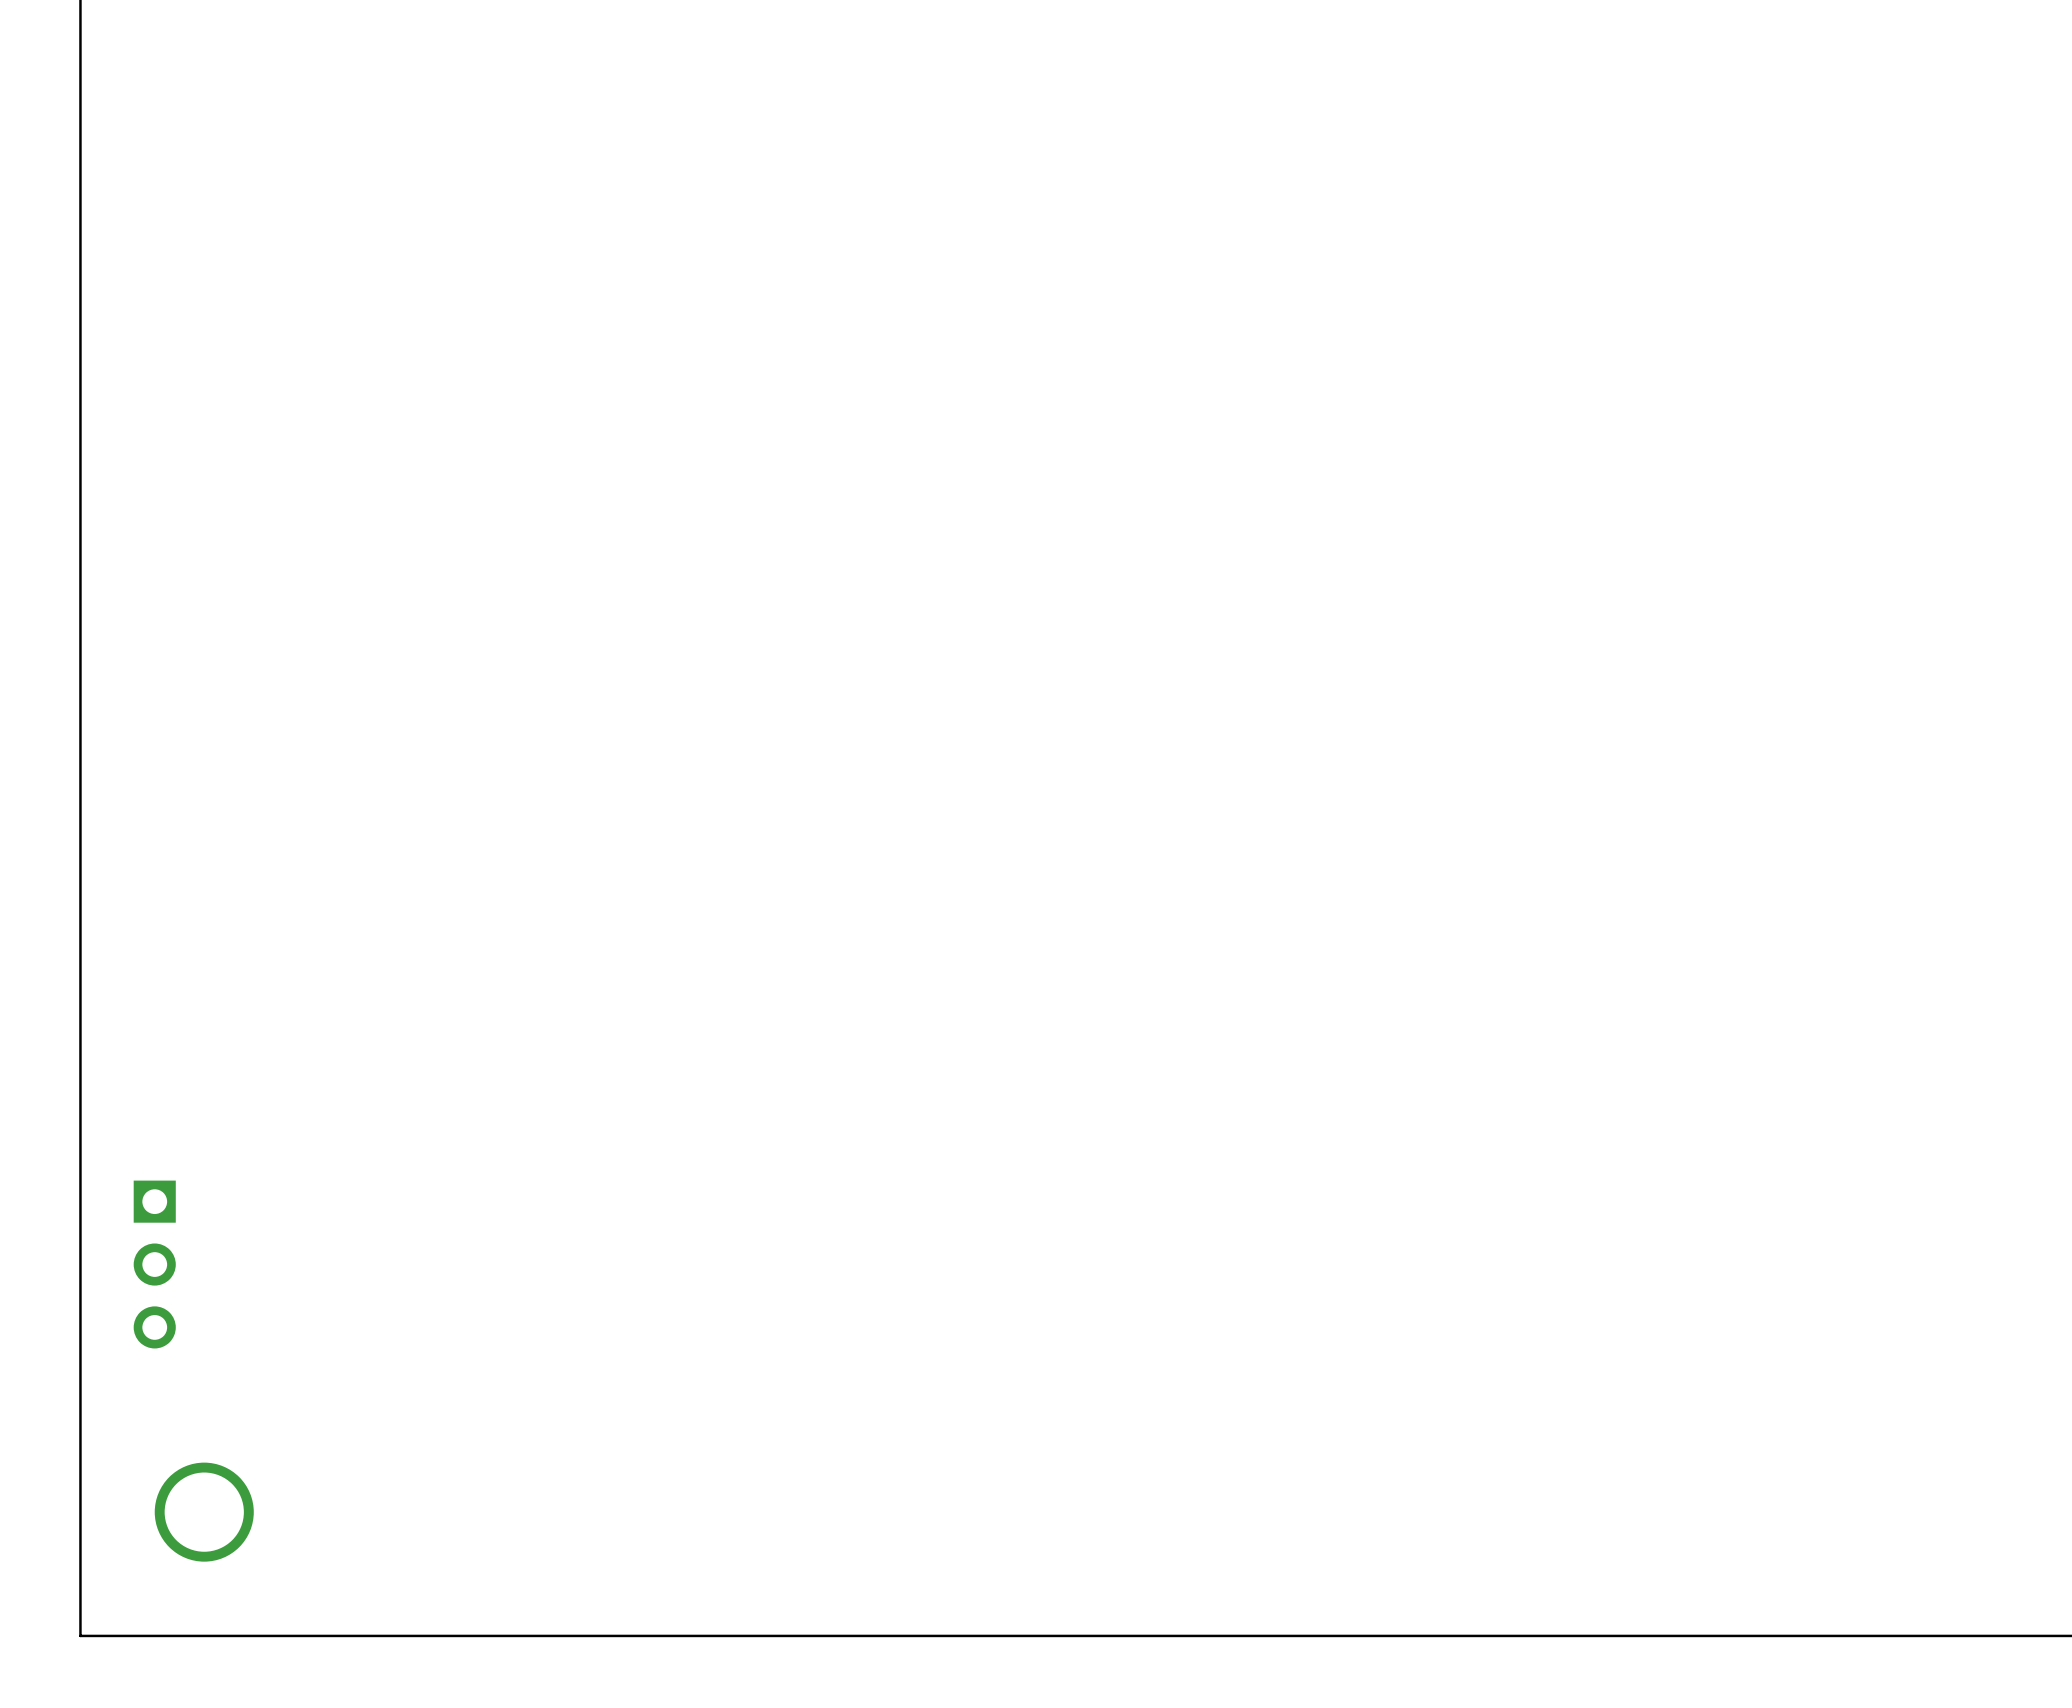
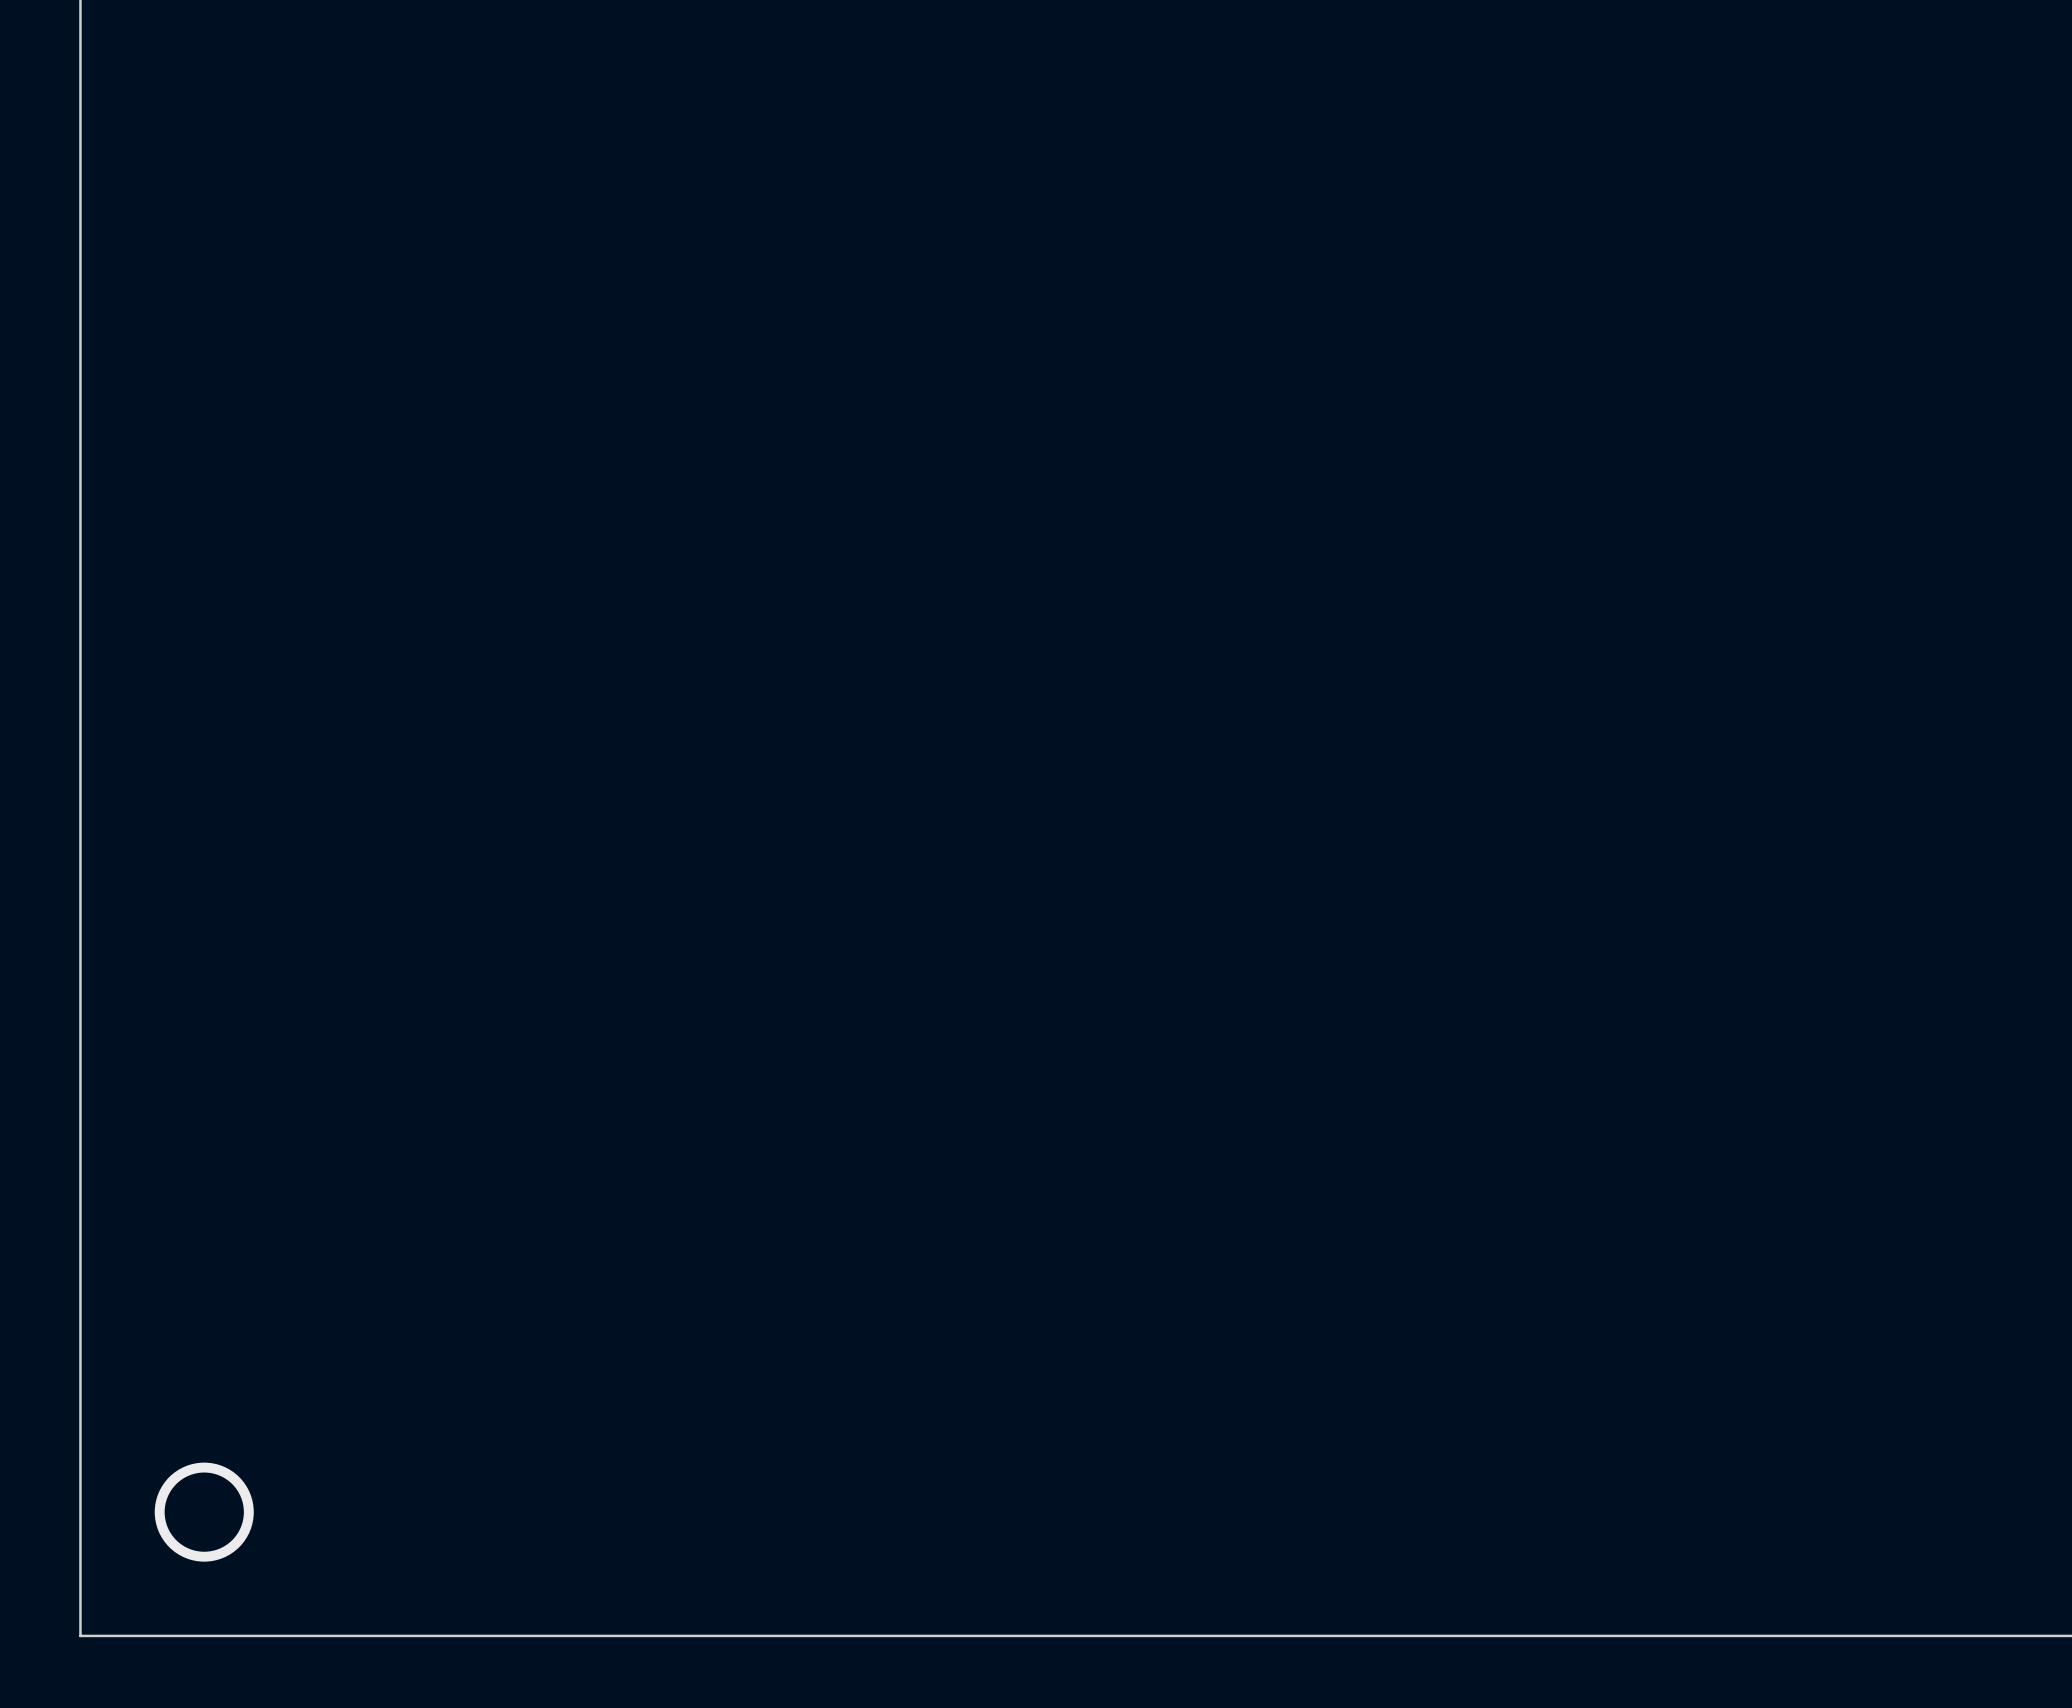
part: (154, 1264) -> none

